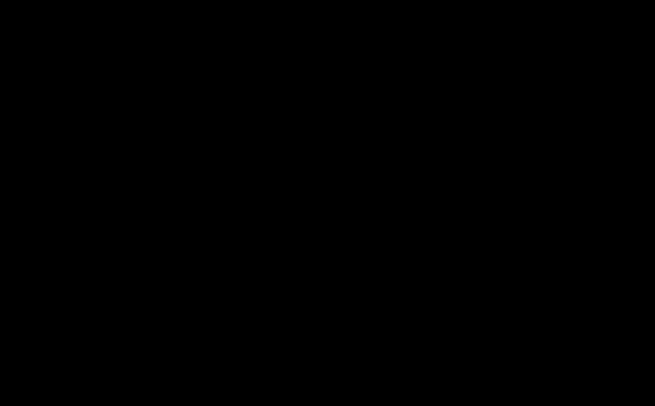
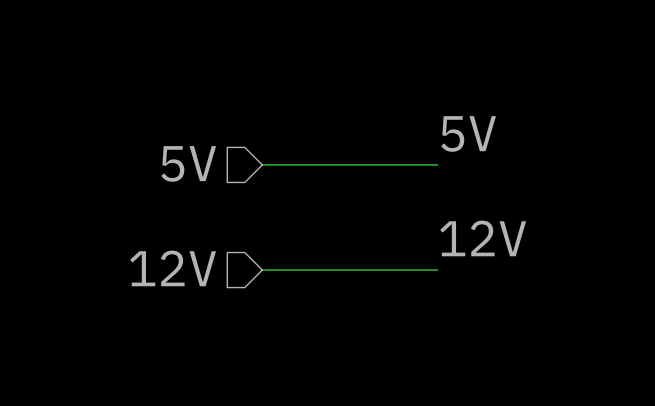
label: none -> 5V (468, 133)
hierarchical label: none -> 5V (188, 163)
wire: none -> (262, 164) (437, 164)
label: none -> 12V (483, 238)
hierarchical label: none -> 12V (173, 268)
wire: none -> (262, 270) (437, 270)

